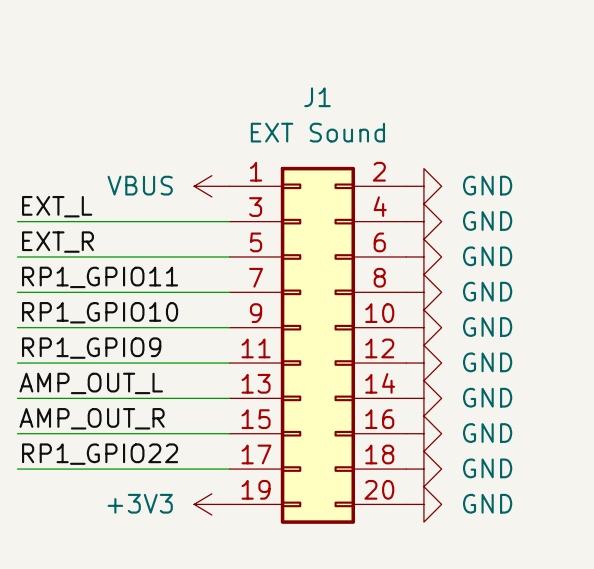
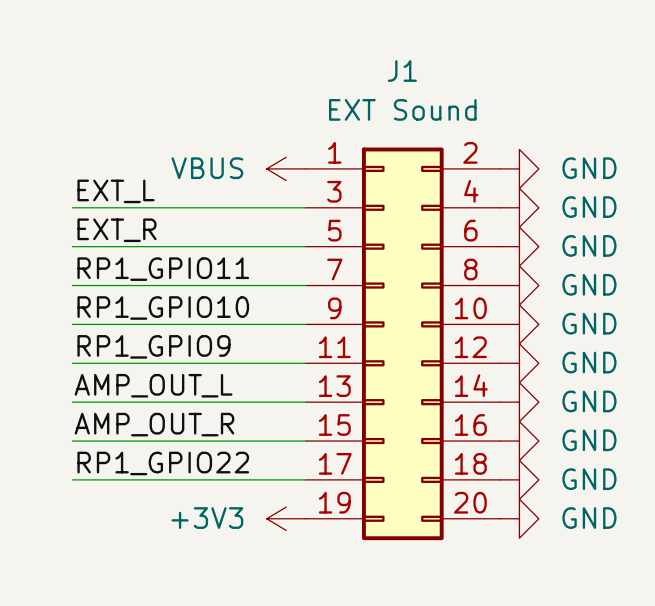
power symbol: none -> GND (519, 168)
label: none -> EXT_L (116, 191)
power symbol position: VBUS (211, 186) -> VBUS (286, 168)
label: EXT_L (57, 206) -> EXT_R (116, 230)
label: EXT_R (58, 242) -> RP1_GPIO11 (163, 269)
label: RP1_GPIO11 (100, 277) -> RP1_GPIO10 (163, 307)
label: RP1_GPIO10 (100, 312) -> RP1_GPIO9 (154, 346)
J1 position: (317, 345) -> (402, 343)
label: RP1_GPIO9 (91, 348) -> AMP_OUT_L (153, 385)
label: AMP_OUT_L (91, 383) -> AMP_OUT_R (154, 424)
label: AMP_OUT_R (92, 418) -> RP1_GPIO22 (163, 463)
label: RP1_GPIO22 (100, 454) -> none
wire: (17, 469) (229, 469) -> (72, 207) (305, 207)
power symbol position: +3V3 (211, 504) -> +3V3 (286, 518)
power symbol: GND (423, 504) -> none

